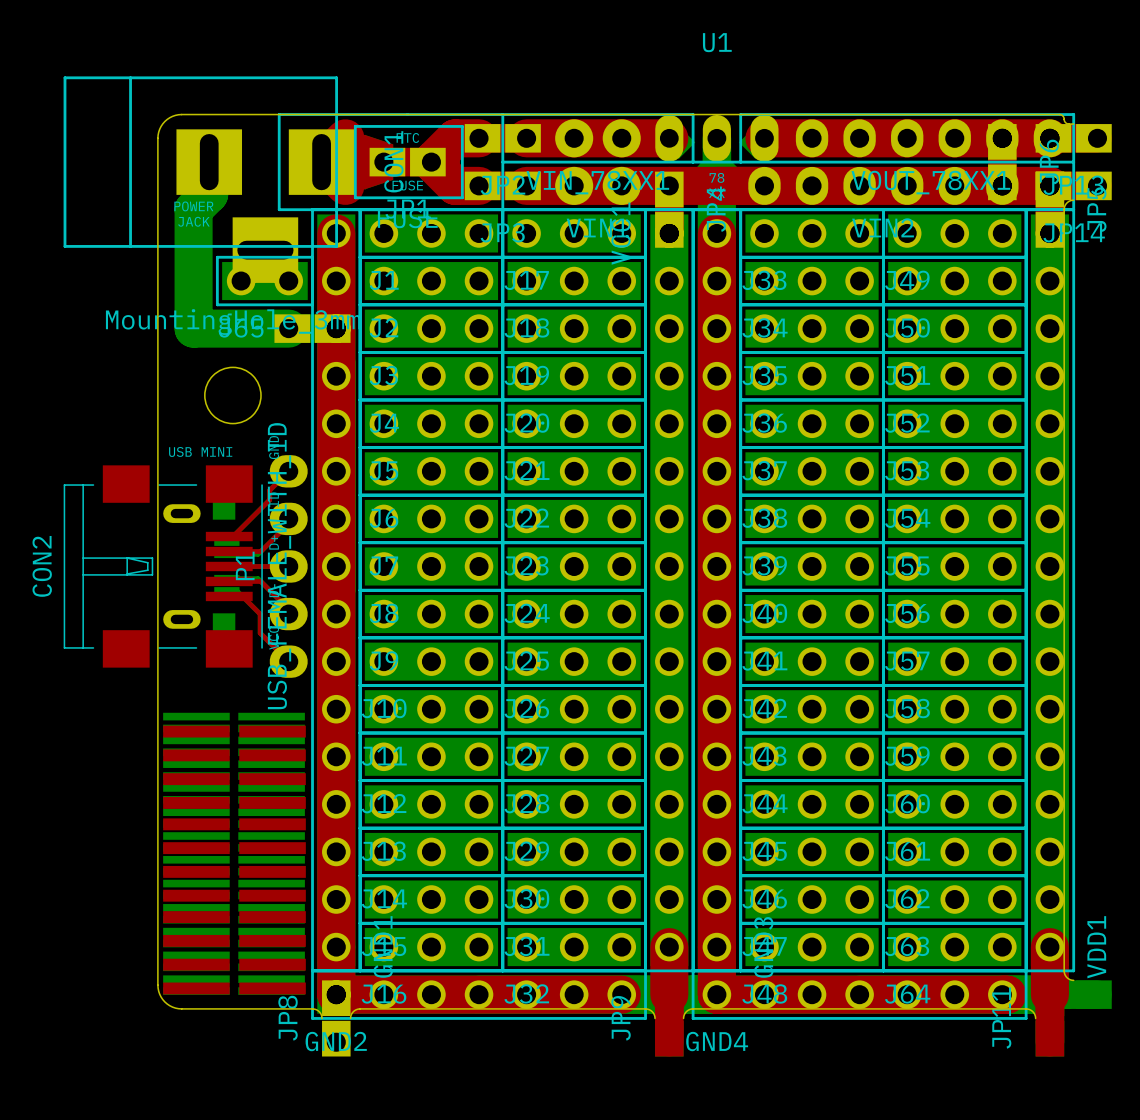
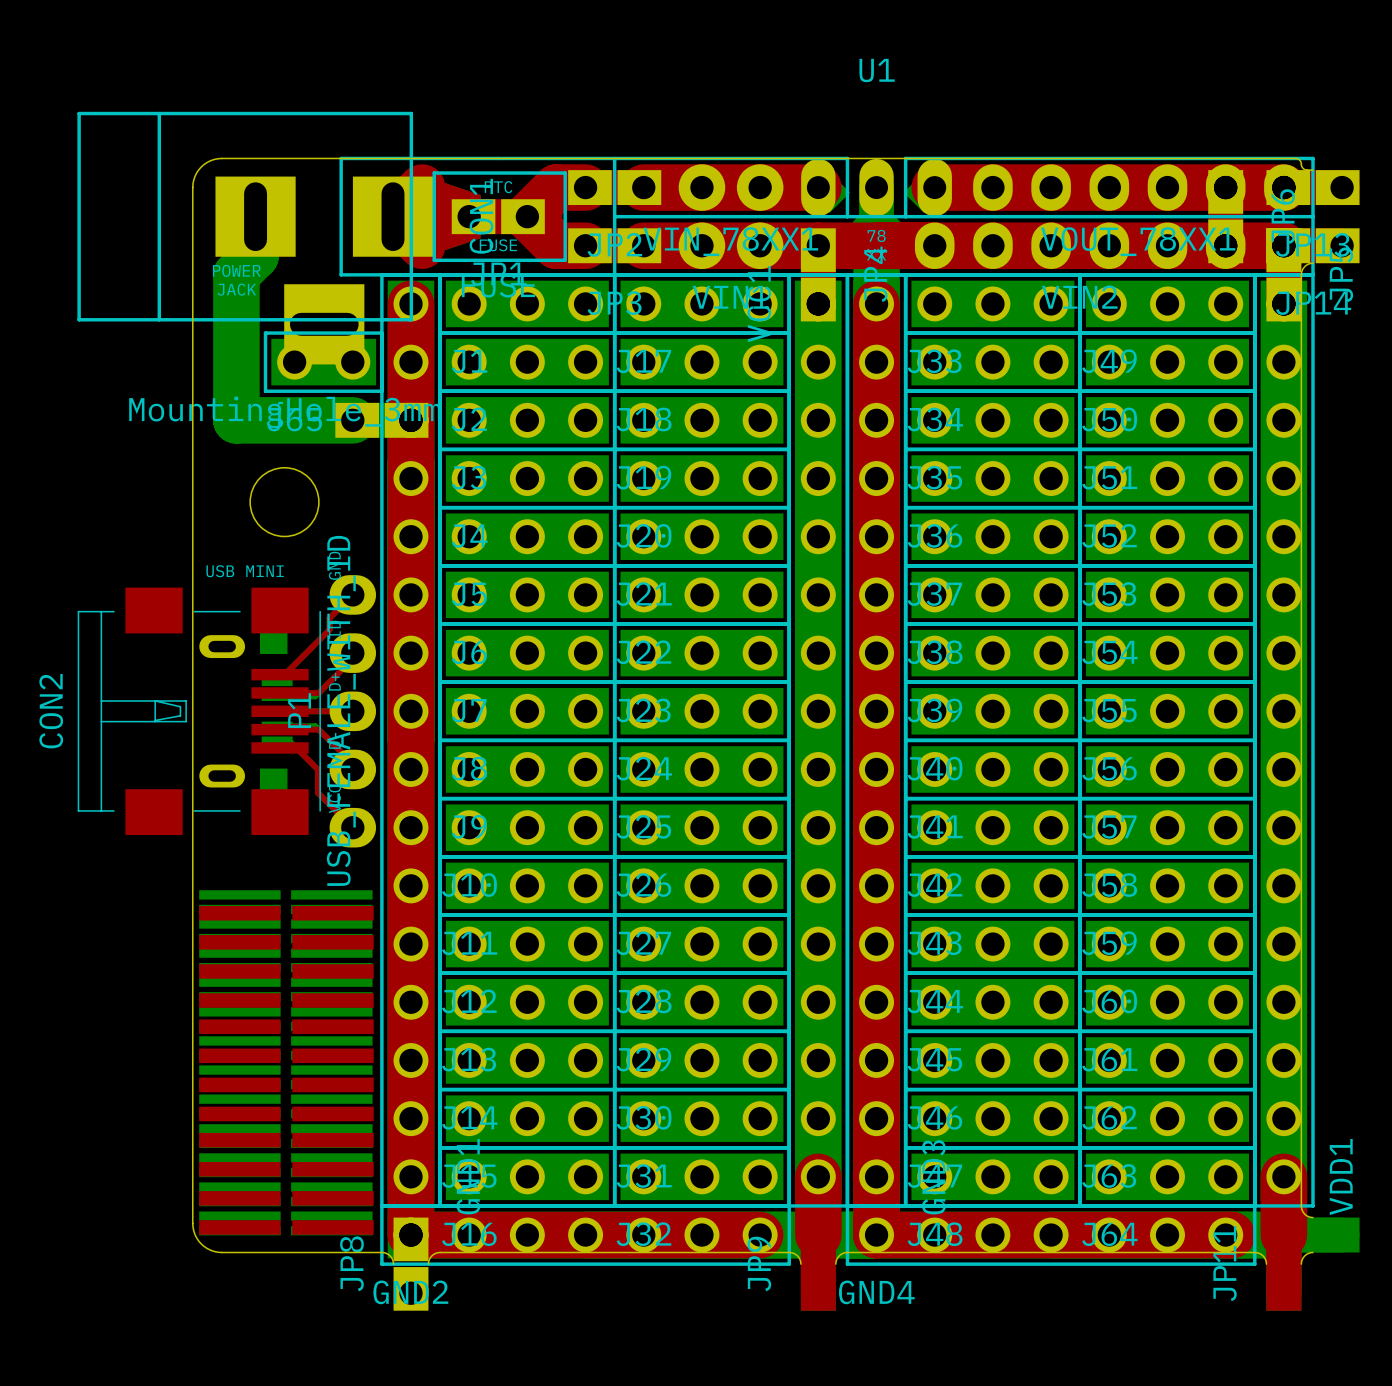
board edge: none -> (1312, 1252) (1304, 1255) (1301, 1264)

